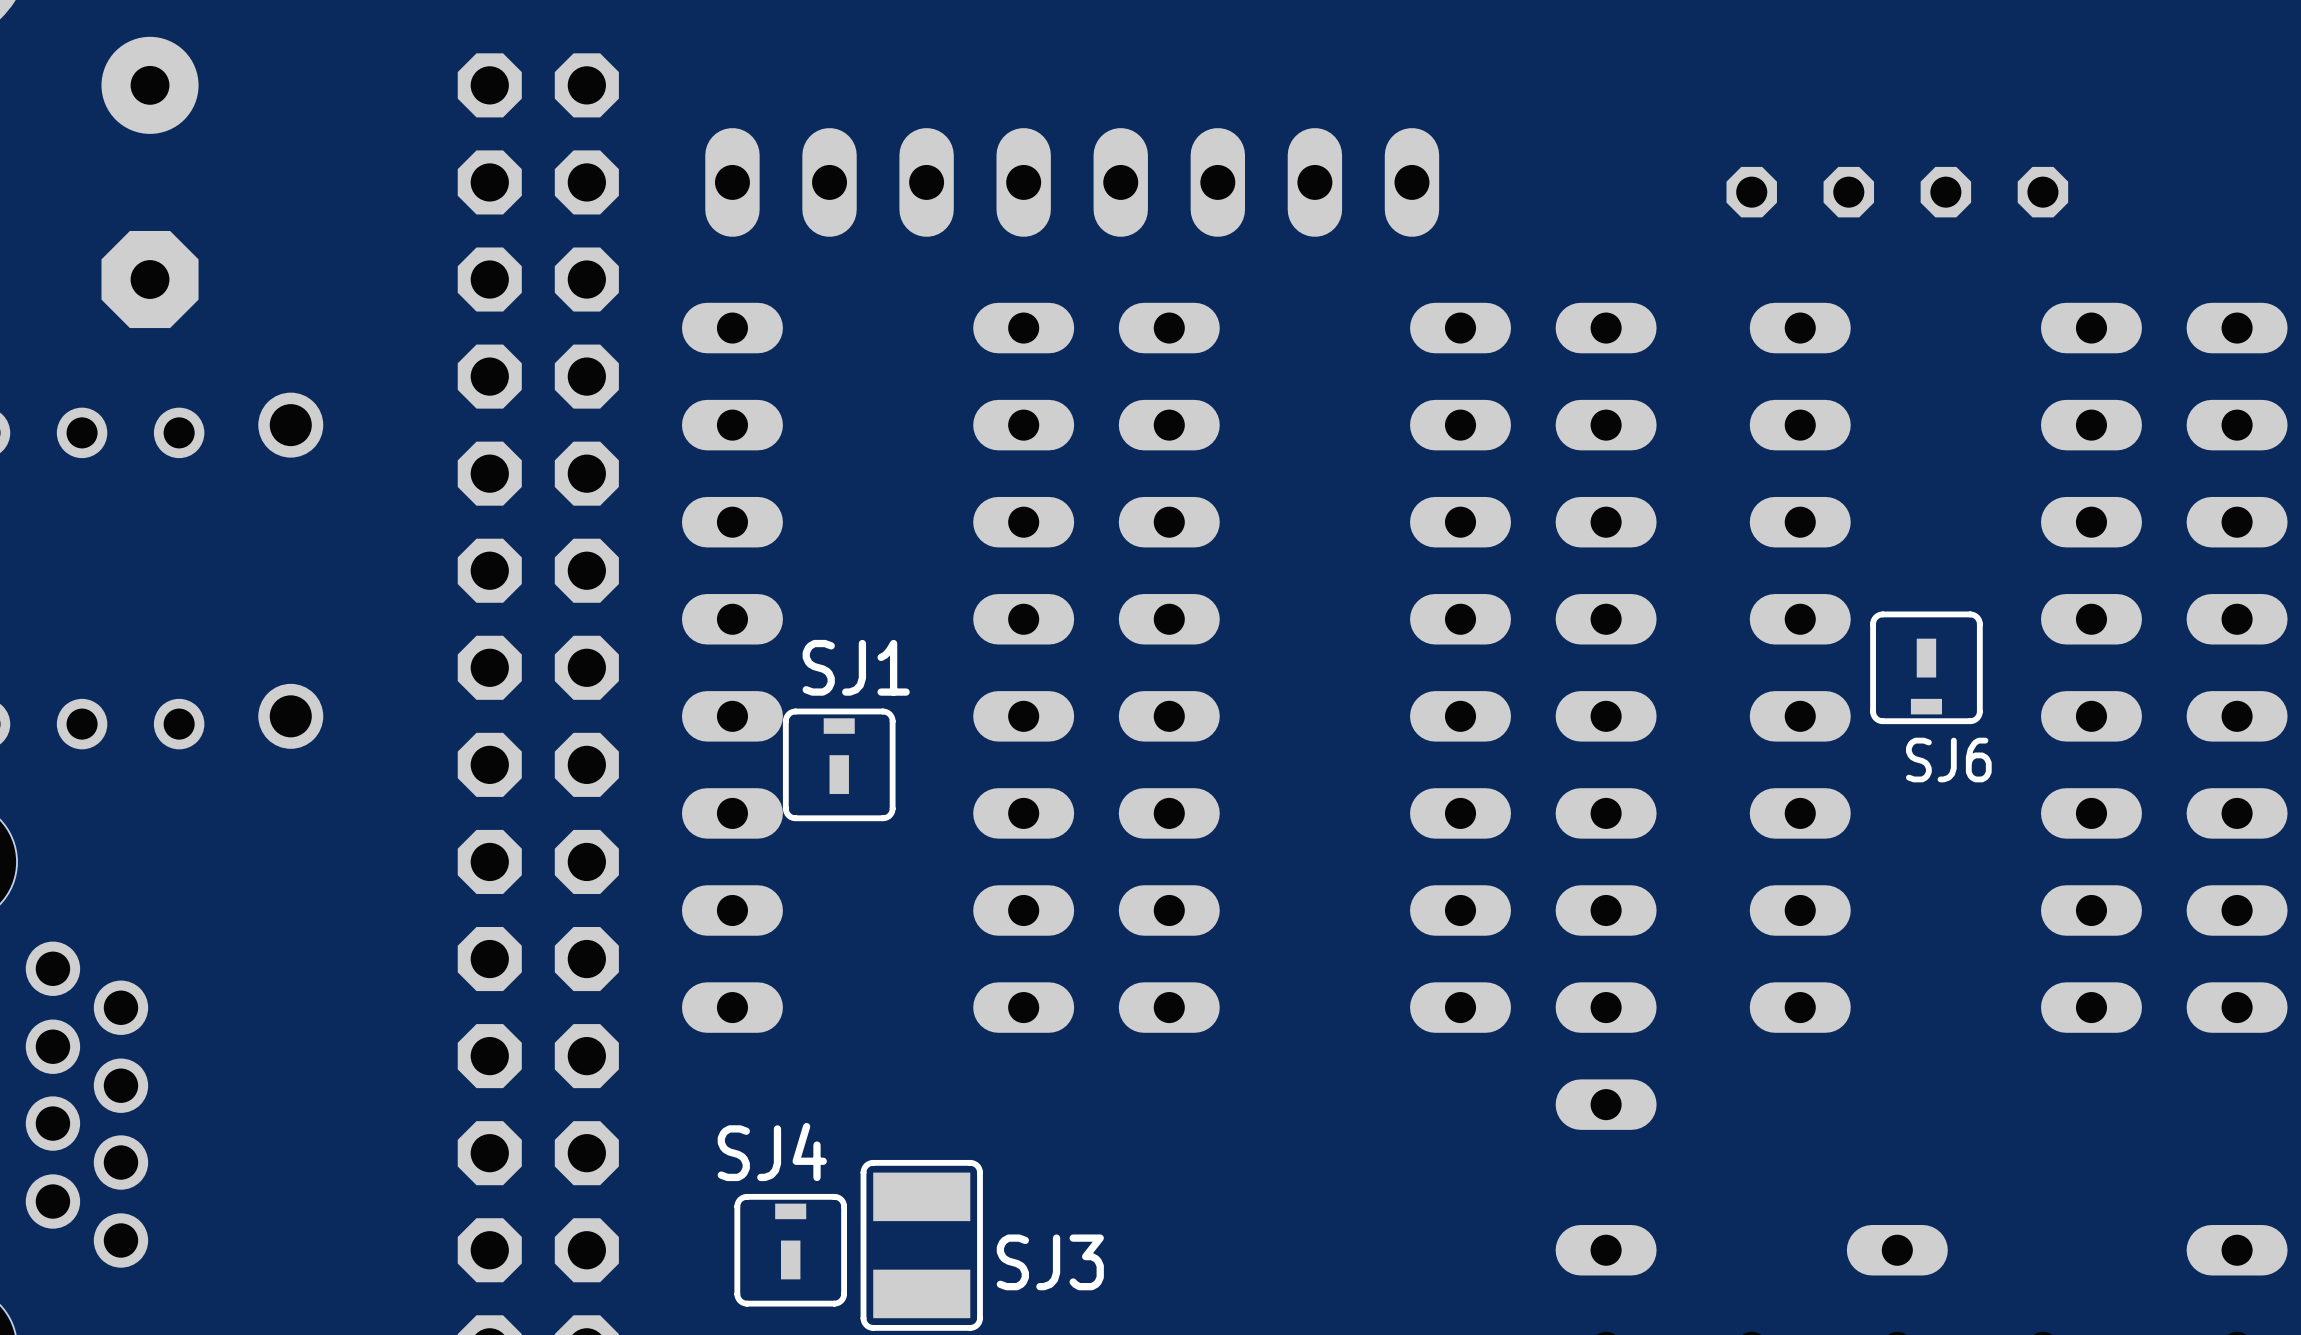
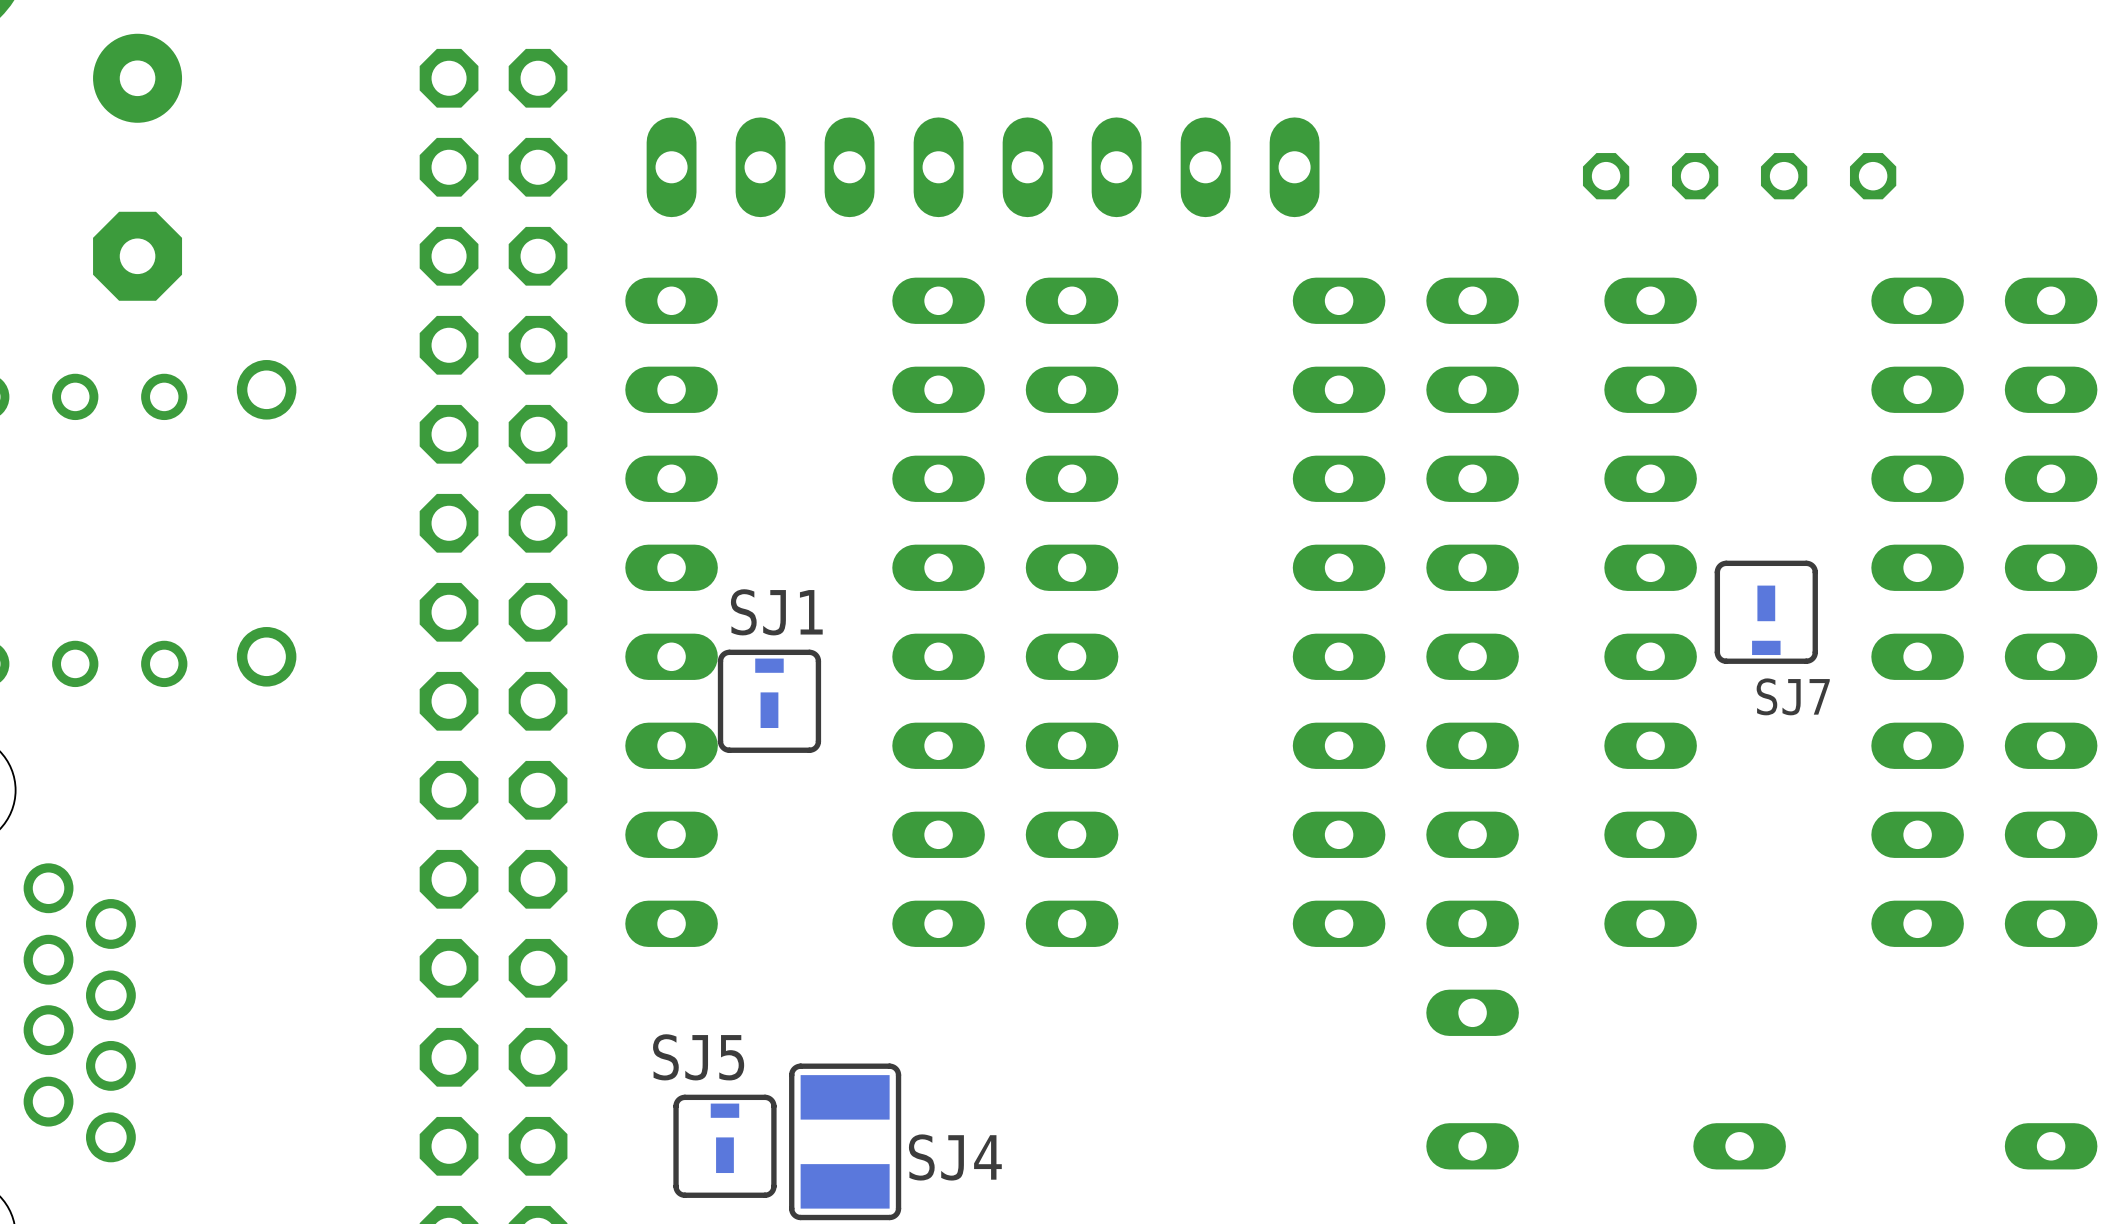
SJ6 name: SJ6 (1948, 760) -> SJ7 (1793, 696)
SJ4 name: SJ4 (772, 1152) -> SJ5 (698, 1057)
SJ3 name: SJ3 (1050, 1262) -> SJ4 (955, 1157)

